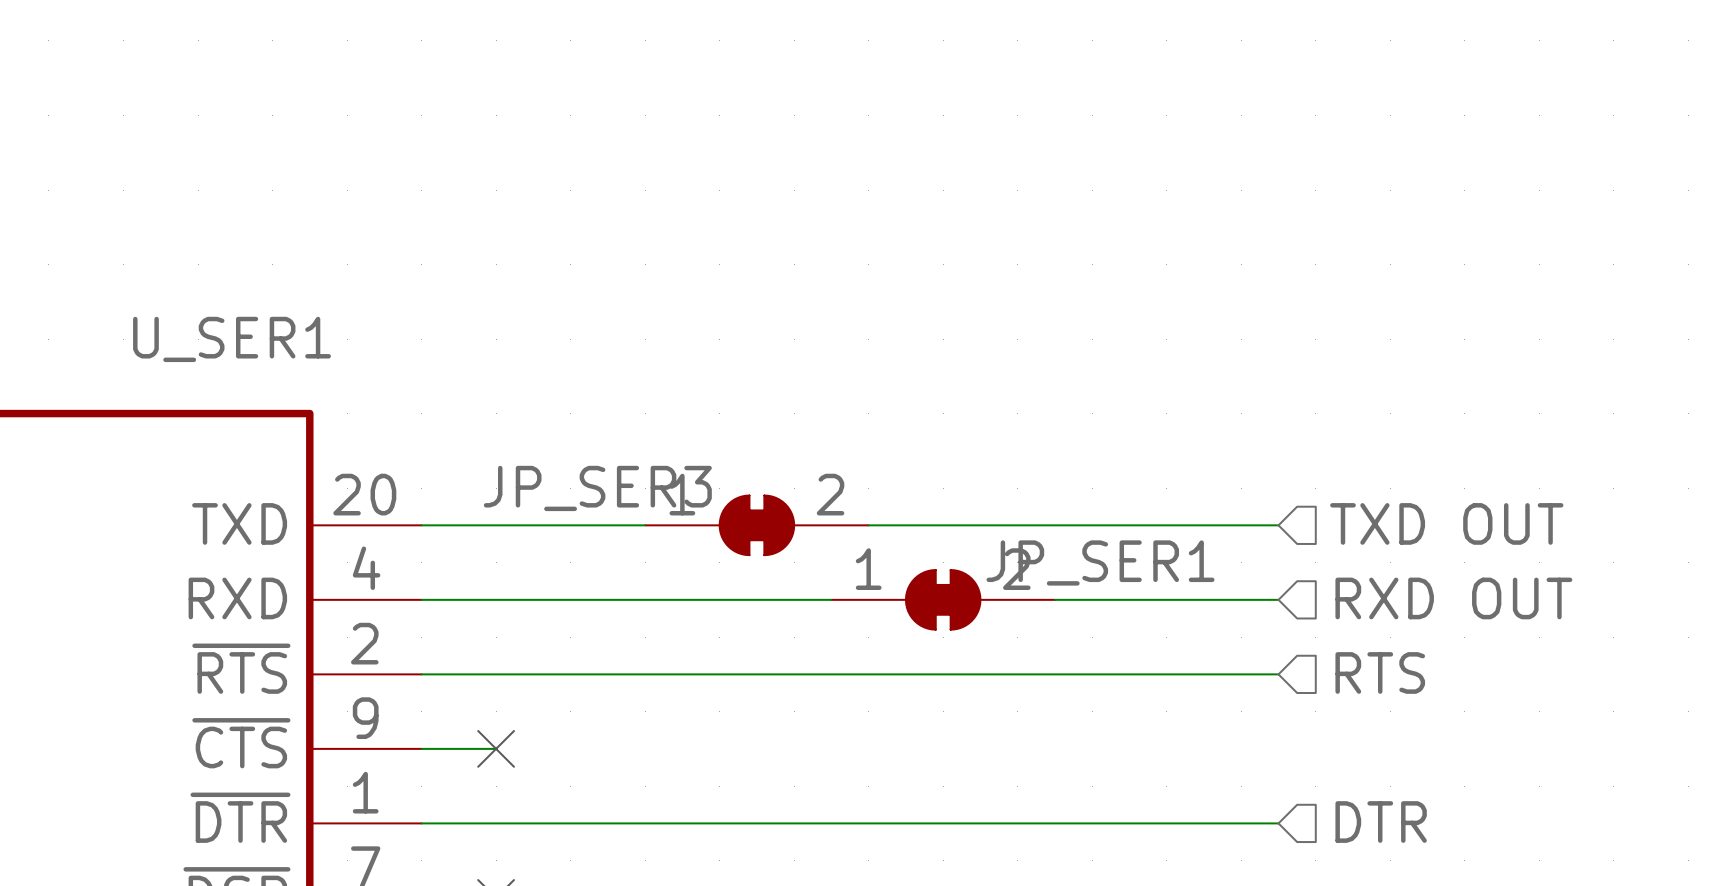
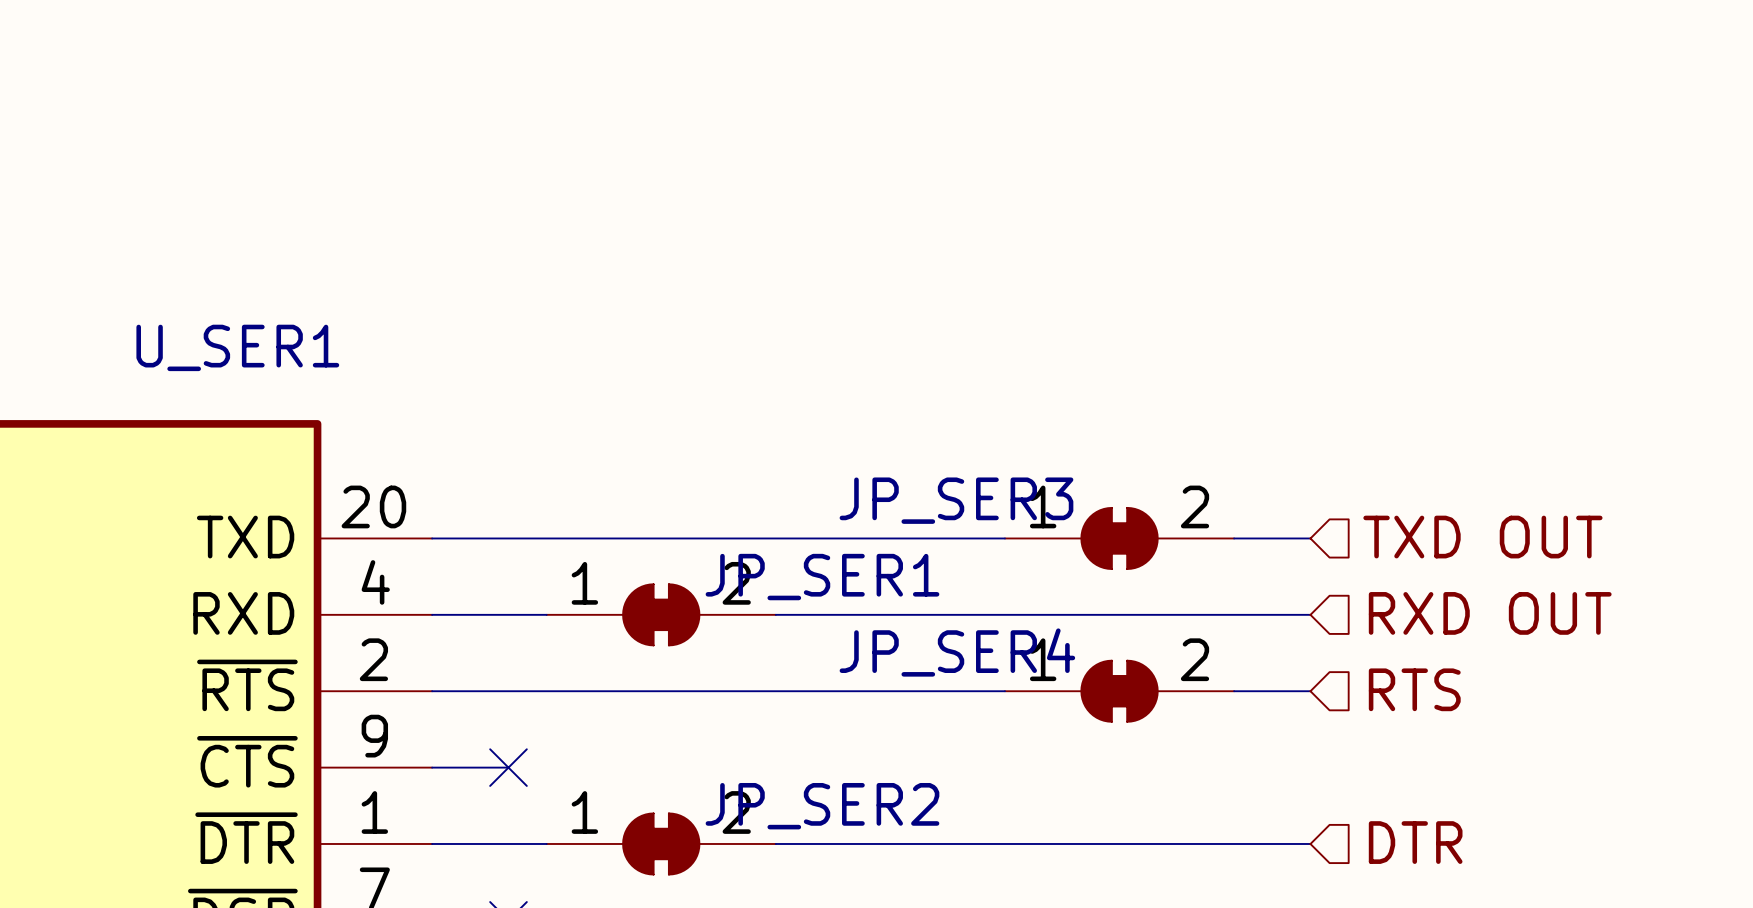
JP_SER3 position: (756, 525) -> (1119, 538)
JP_SER1 position: (943, 599) -> (661, 614)
JP_SER4: none -> (1119, 691)
JP_SER2: none -> (661, 843)

